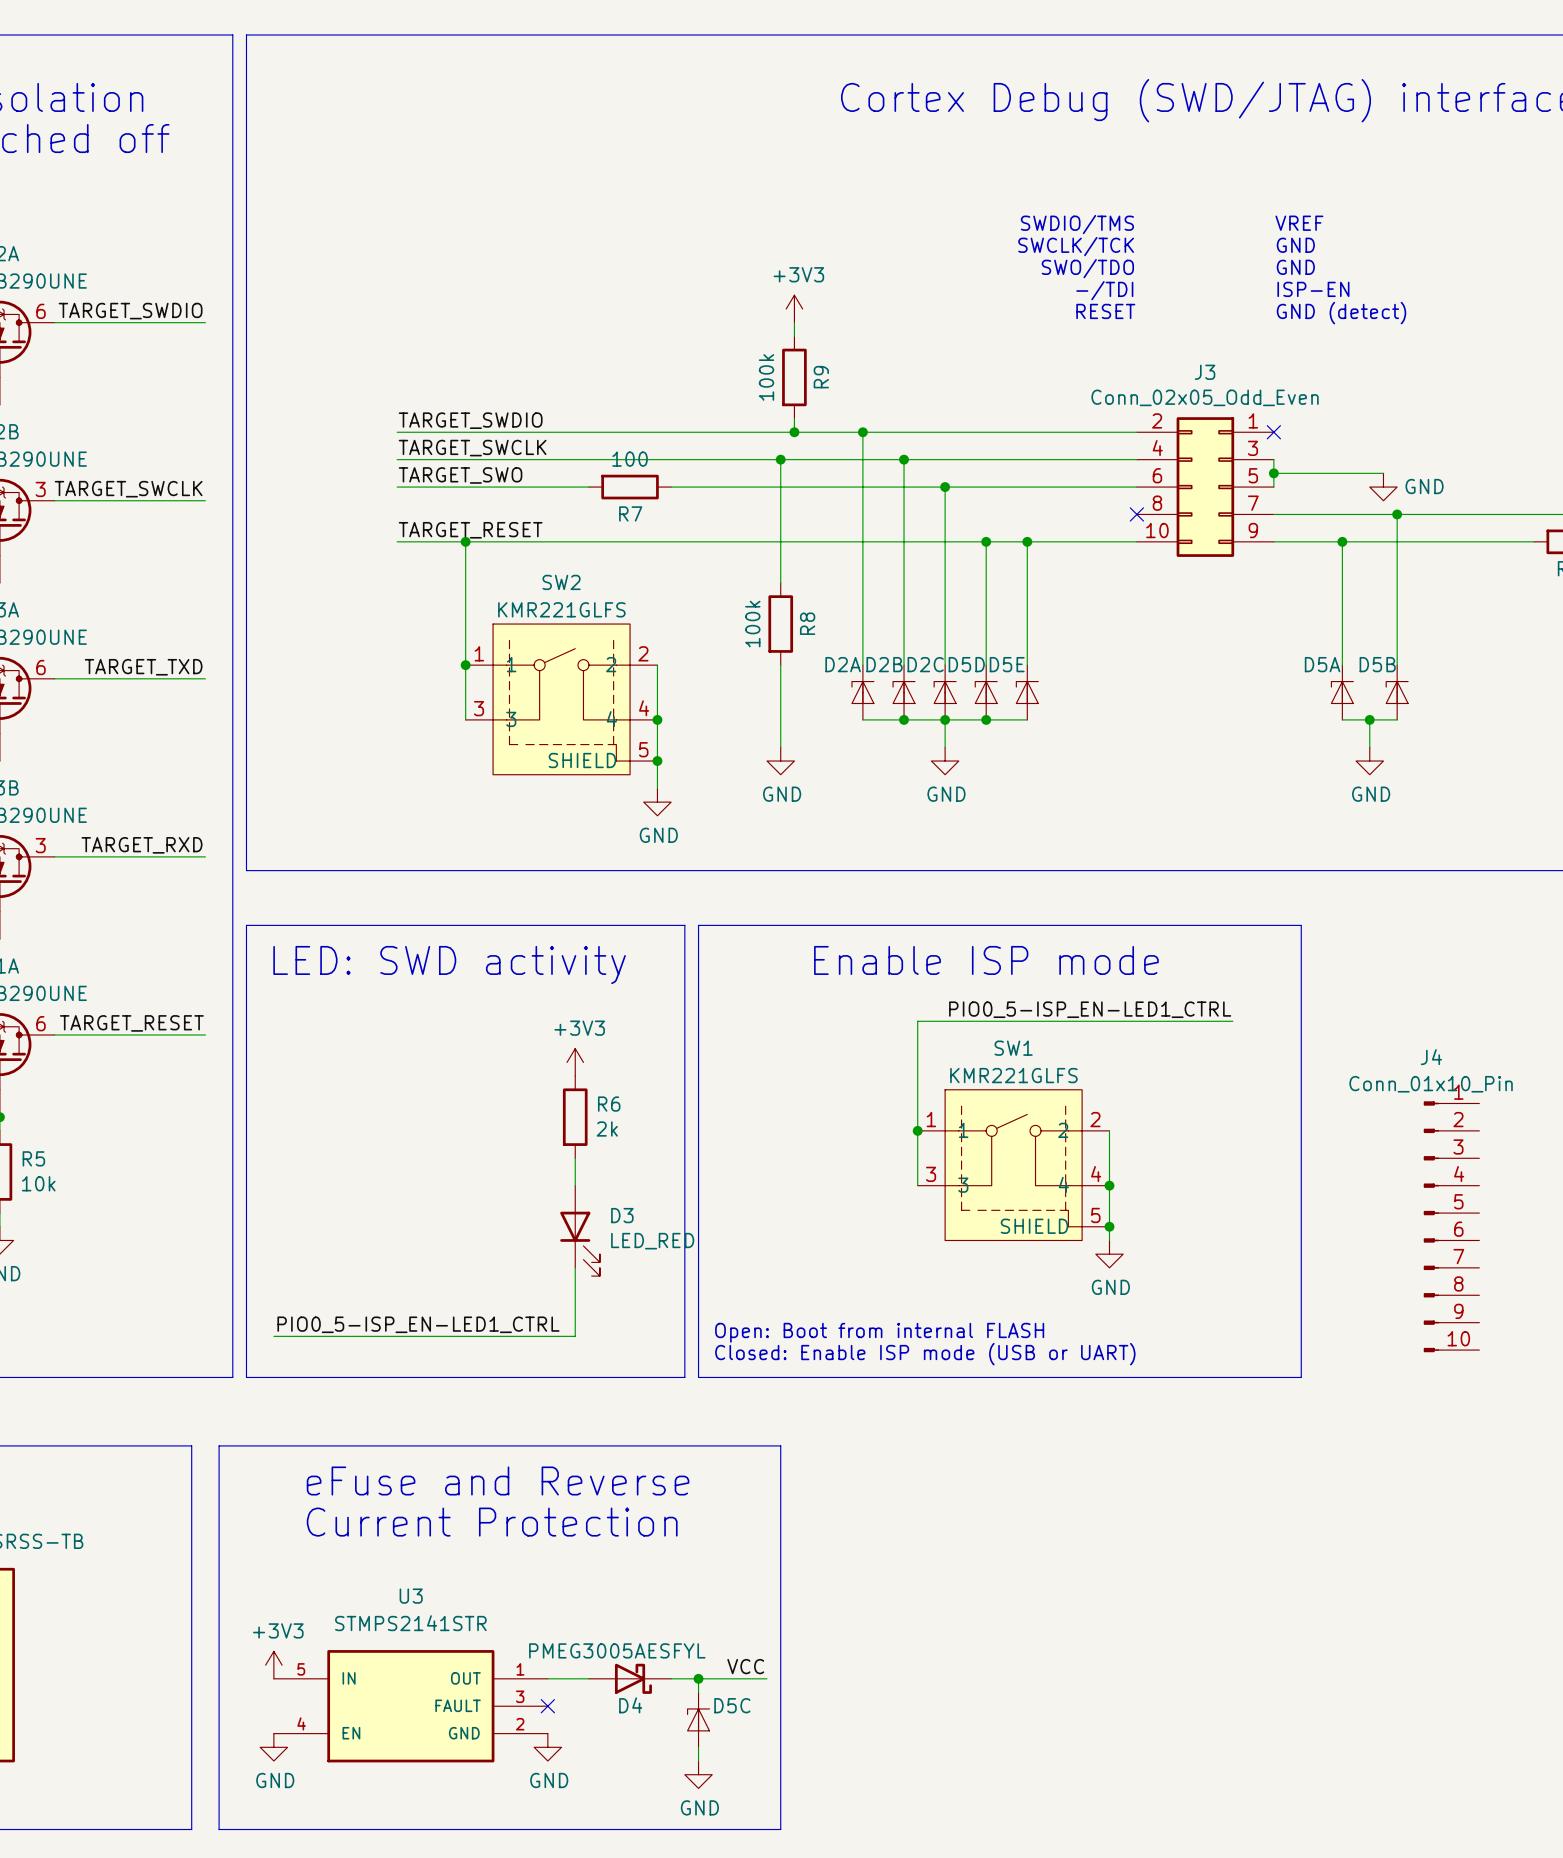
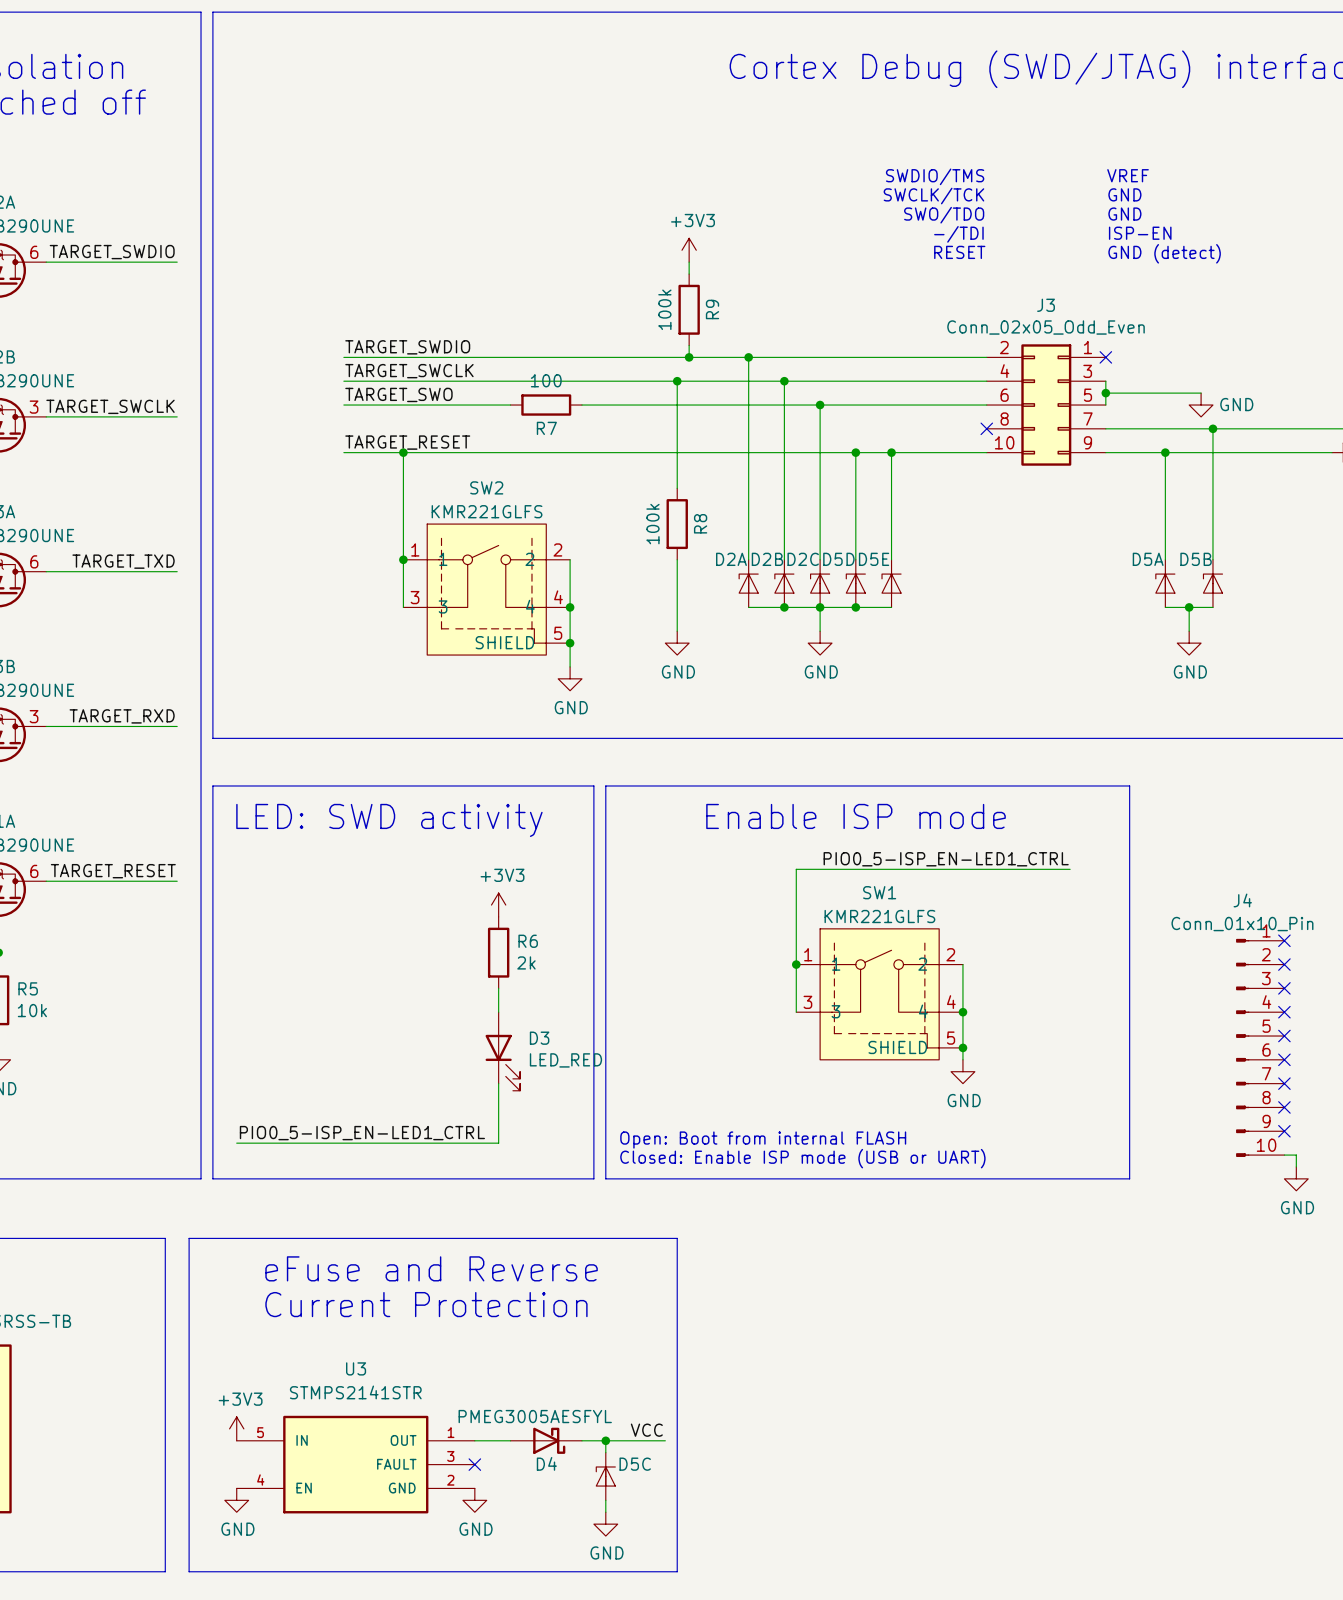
no-connect mark: none -> (1284, 940)
no-connect mark: none -> (1284, 964)
no-connect mark: none -> (1284, 988)
no-connect mark: none -> (1284, 1012)
no-connect mark: none -> (1284, 1036)
no-connect mark: none -> (1284, 1059)
no-connect mark: none -> (1284, 1083)
no-connect mark: none -> (1284, 1107)
no-connect mark: none -> (1284, 1131)
wire: none -> (1284, 1155) (1296, 1155) (1296, 1166)
power symbol: none -> GND (1296, 1178)

